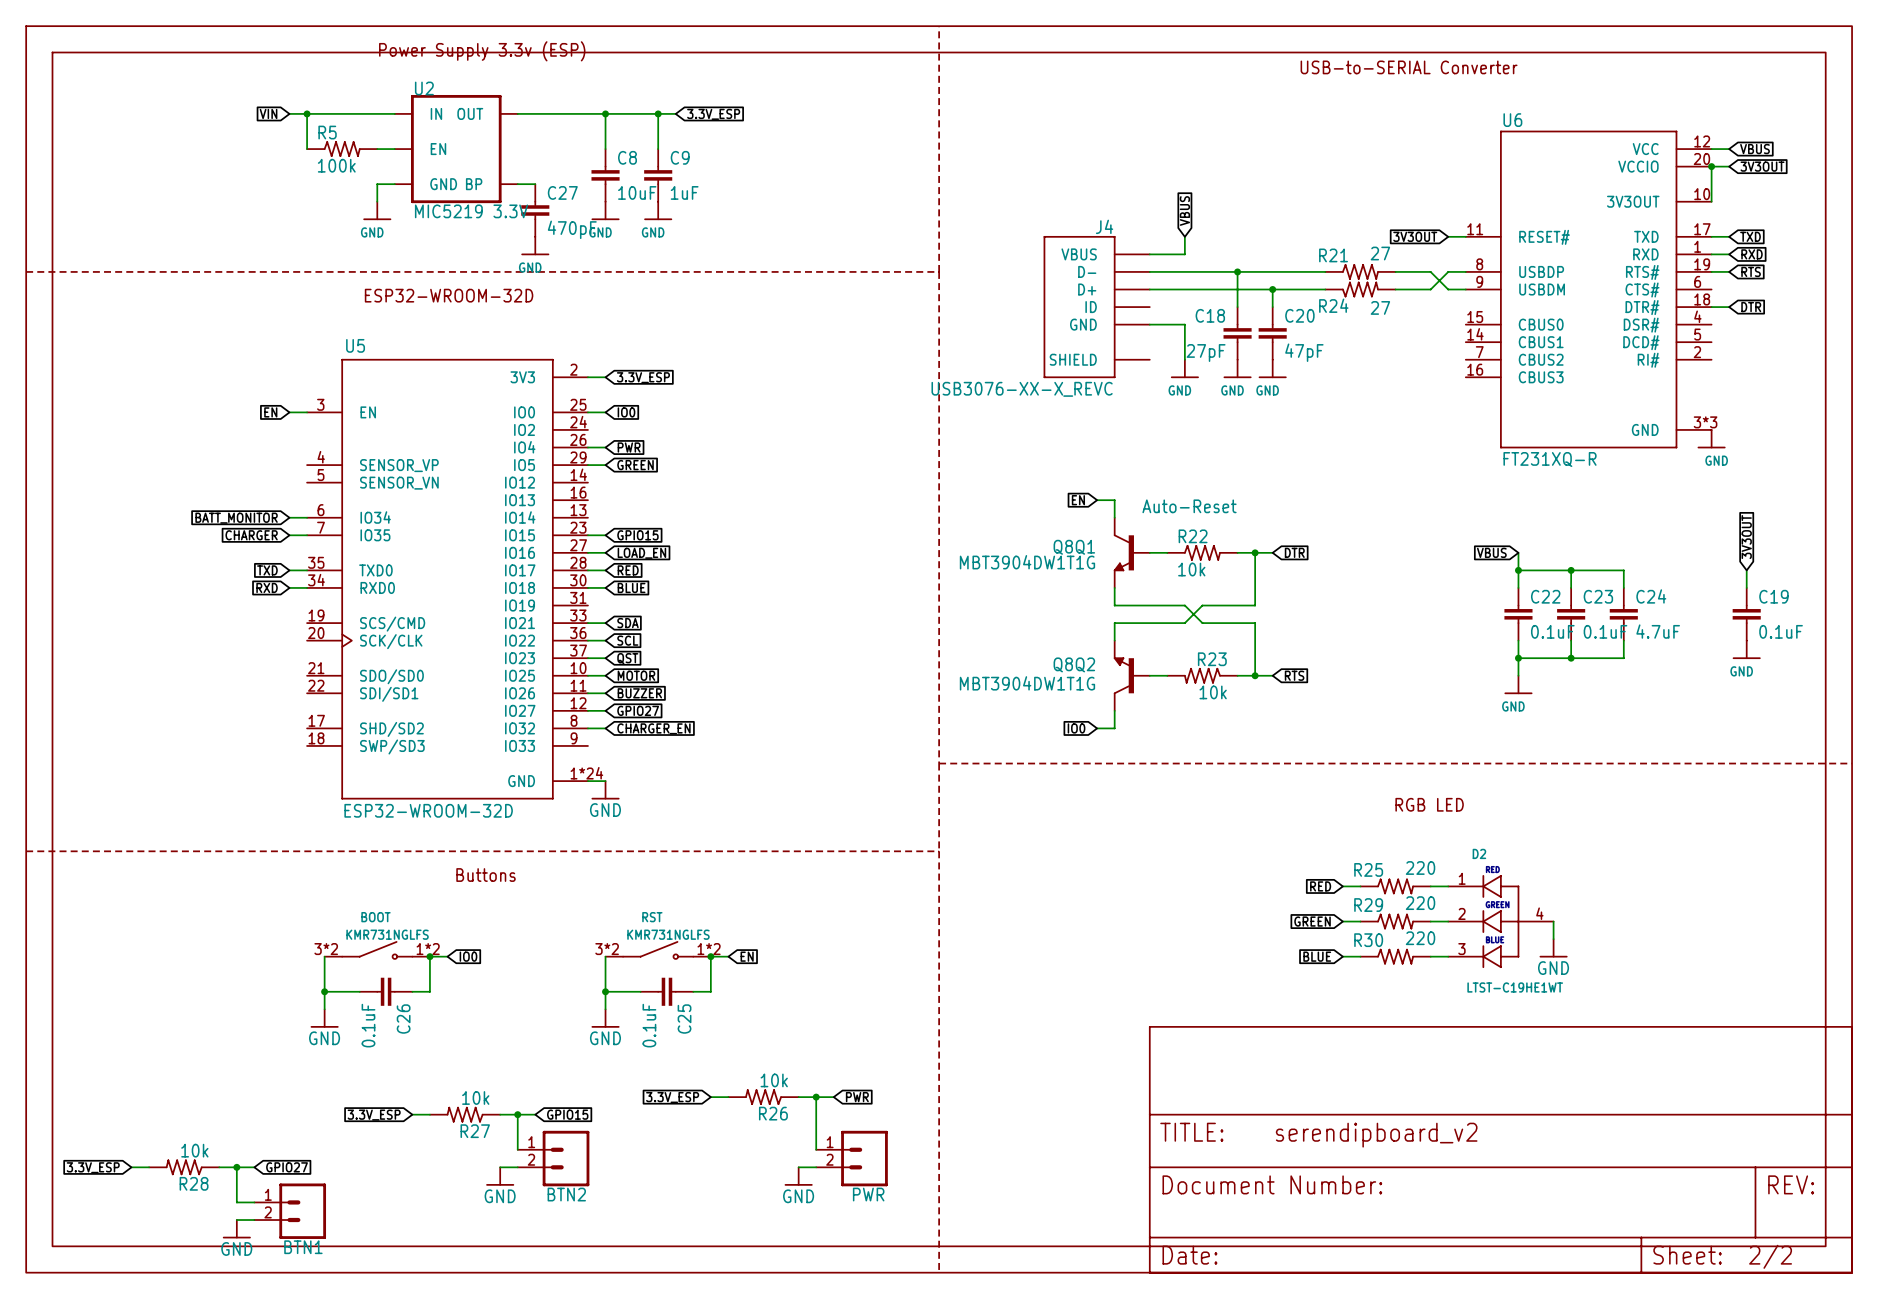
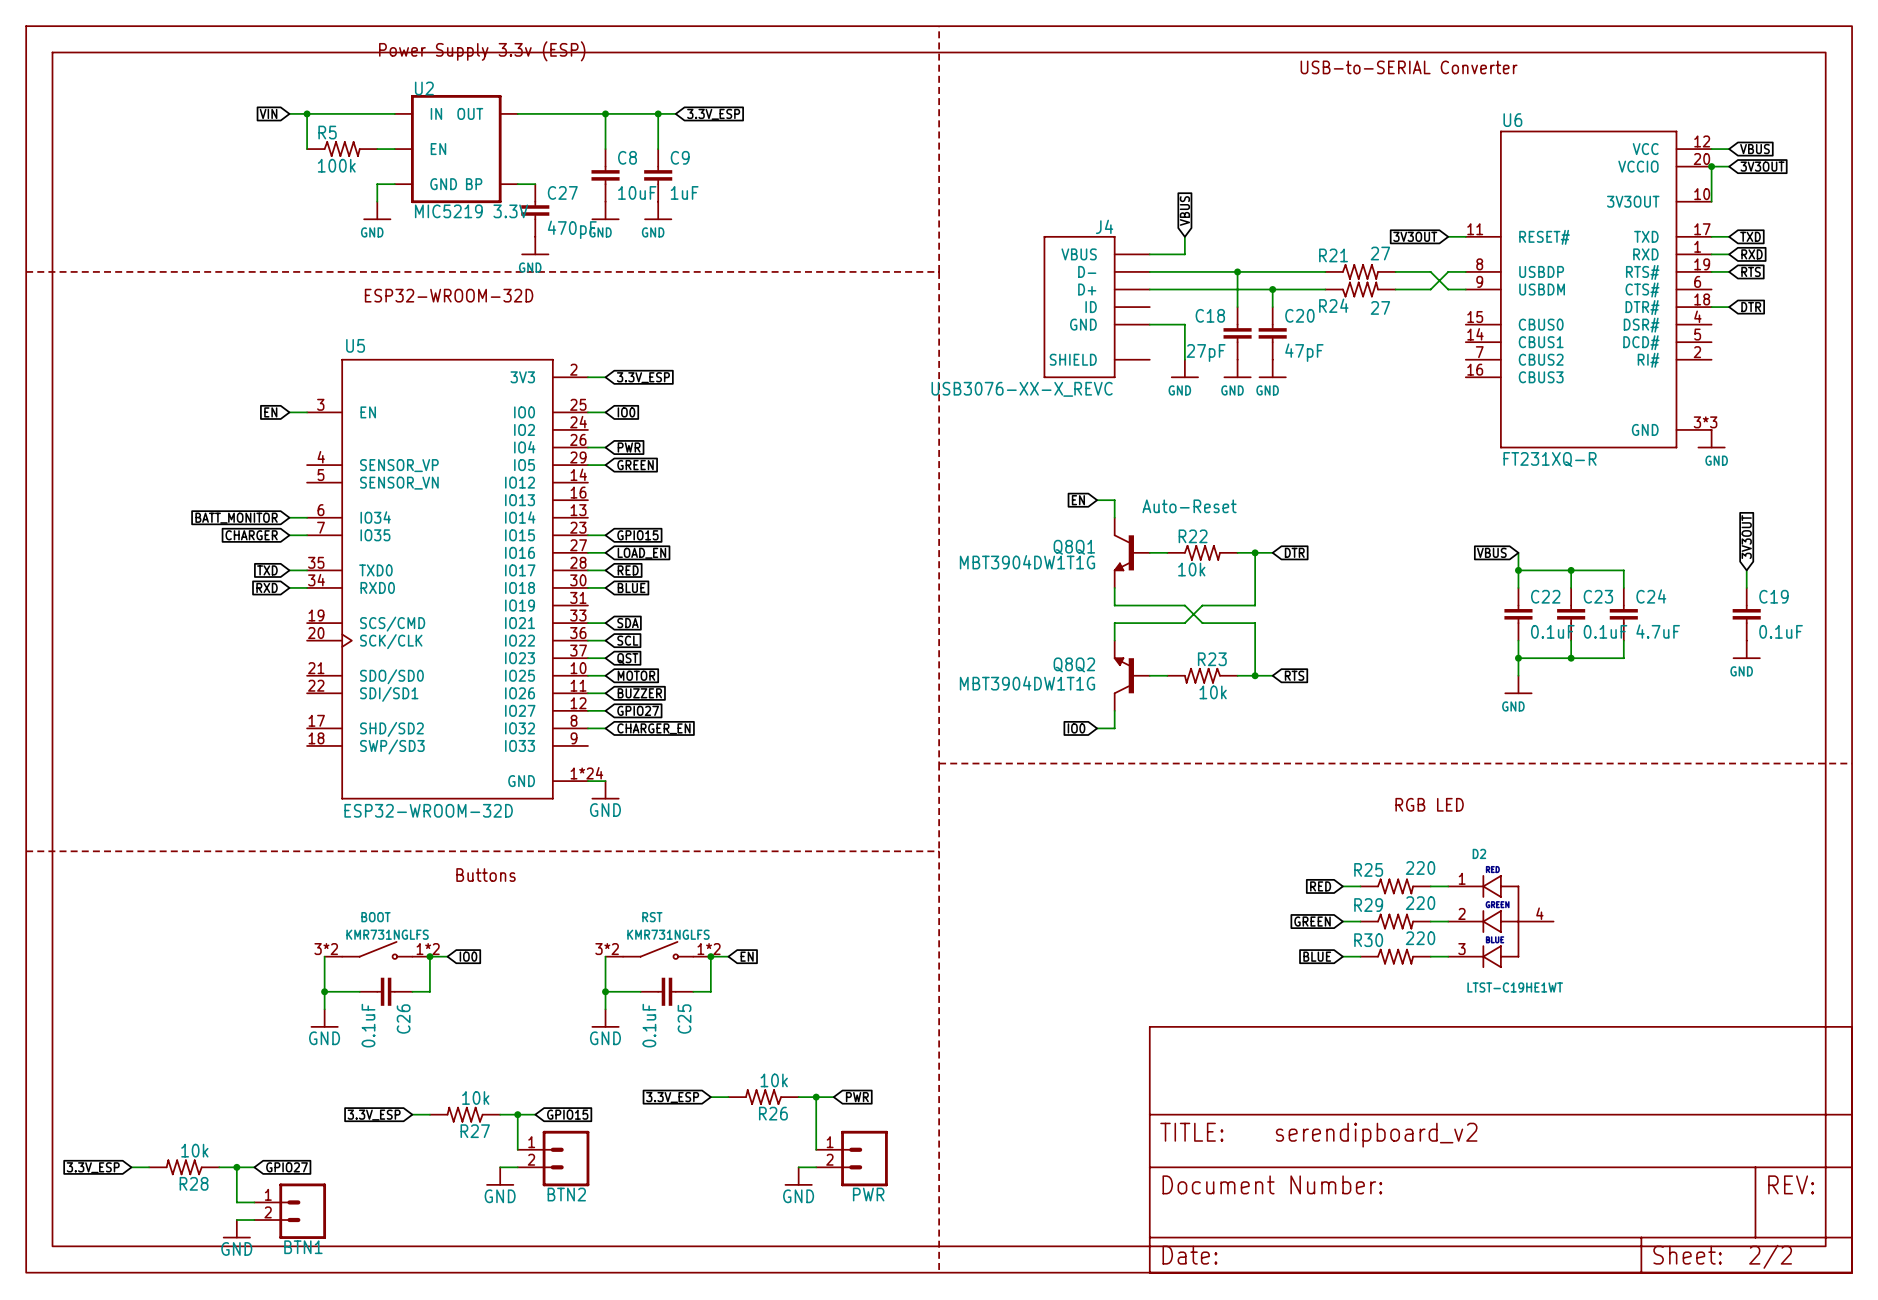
wire: (1553, 921) (1553, 939) -> none
power symbol: GND (1553, 948) -> none

